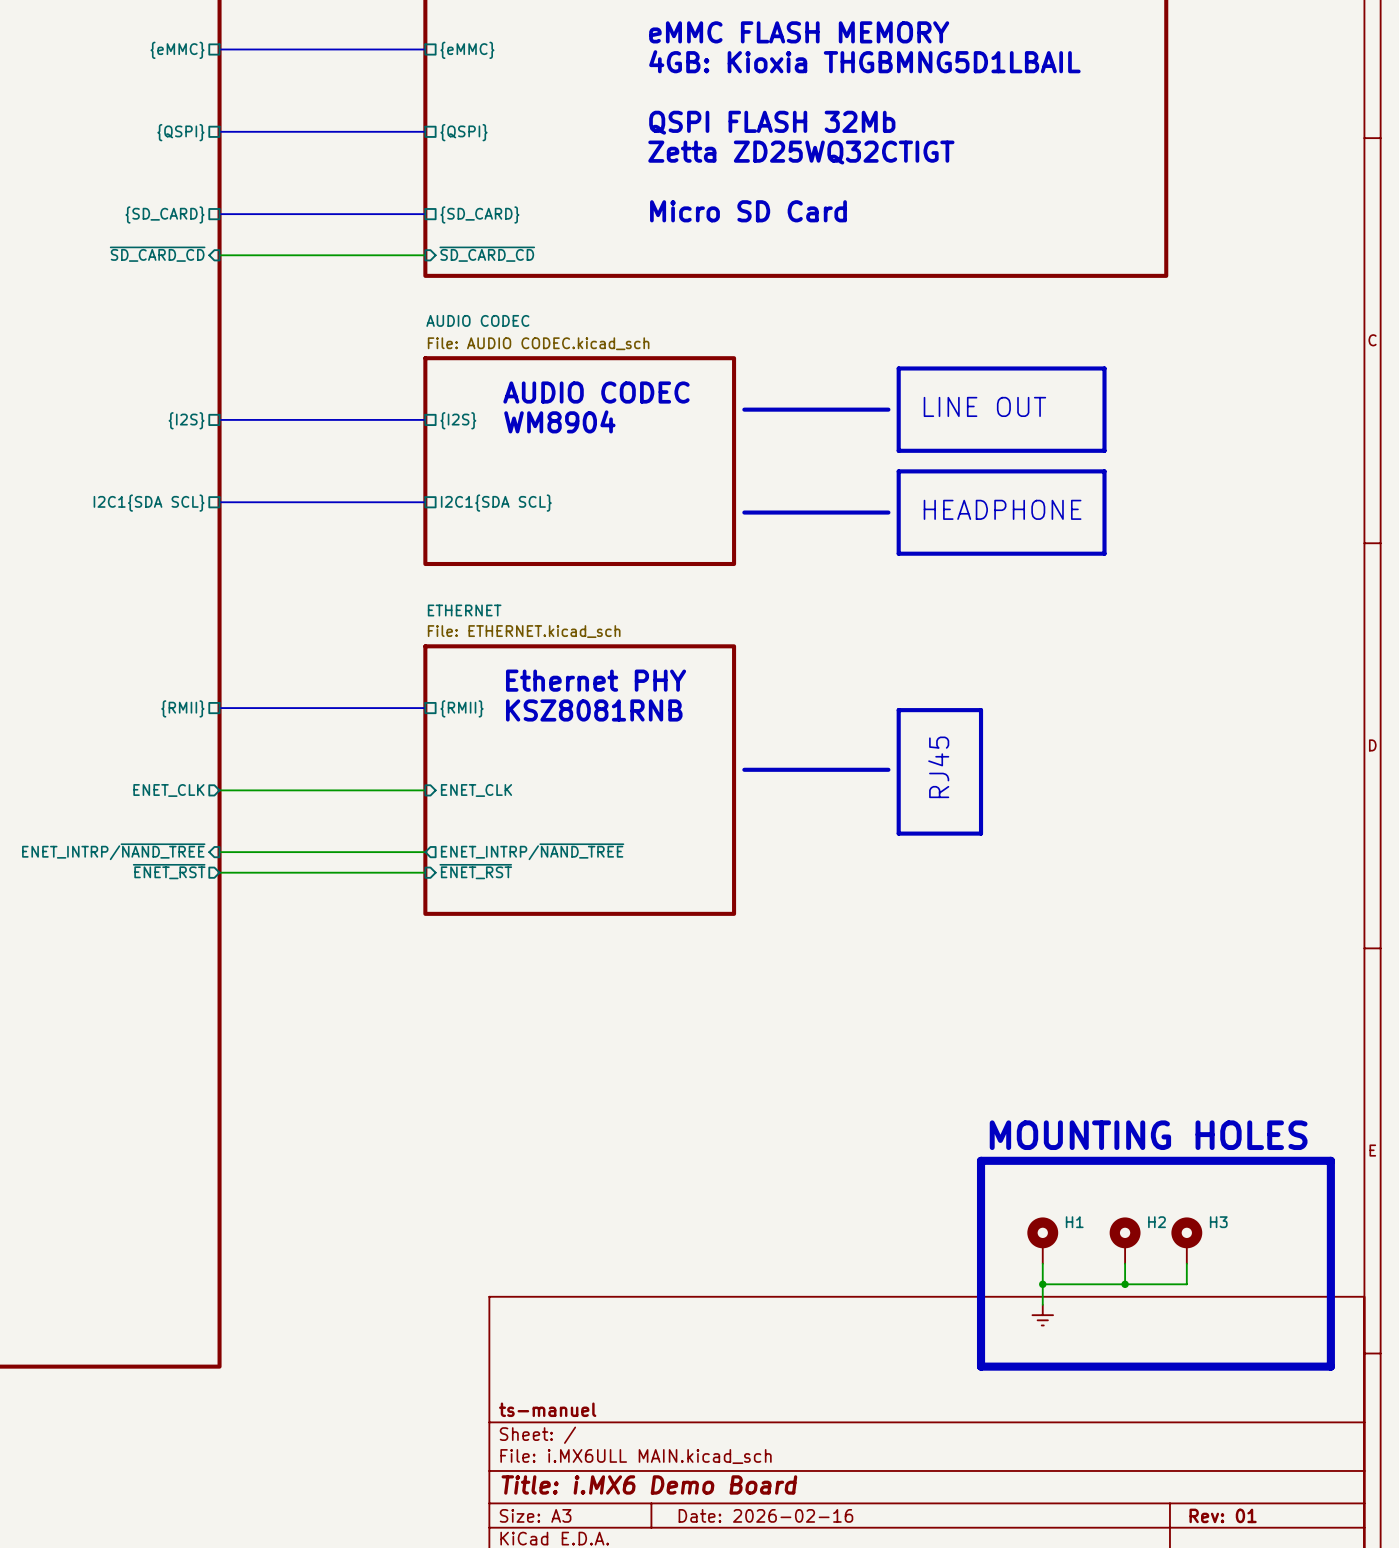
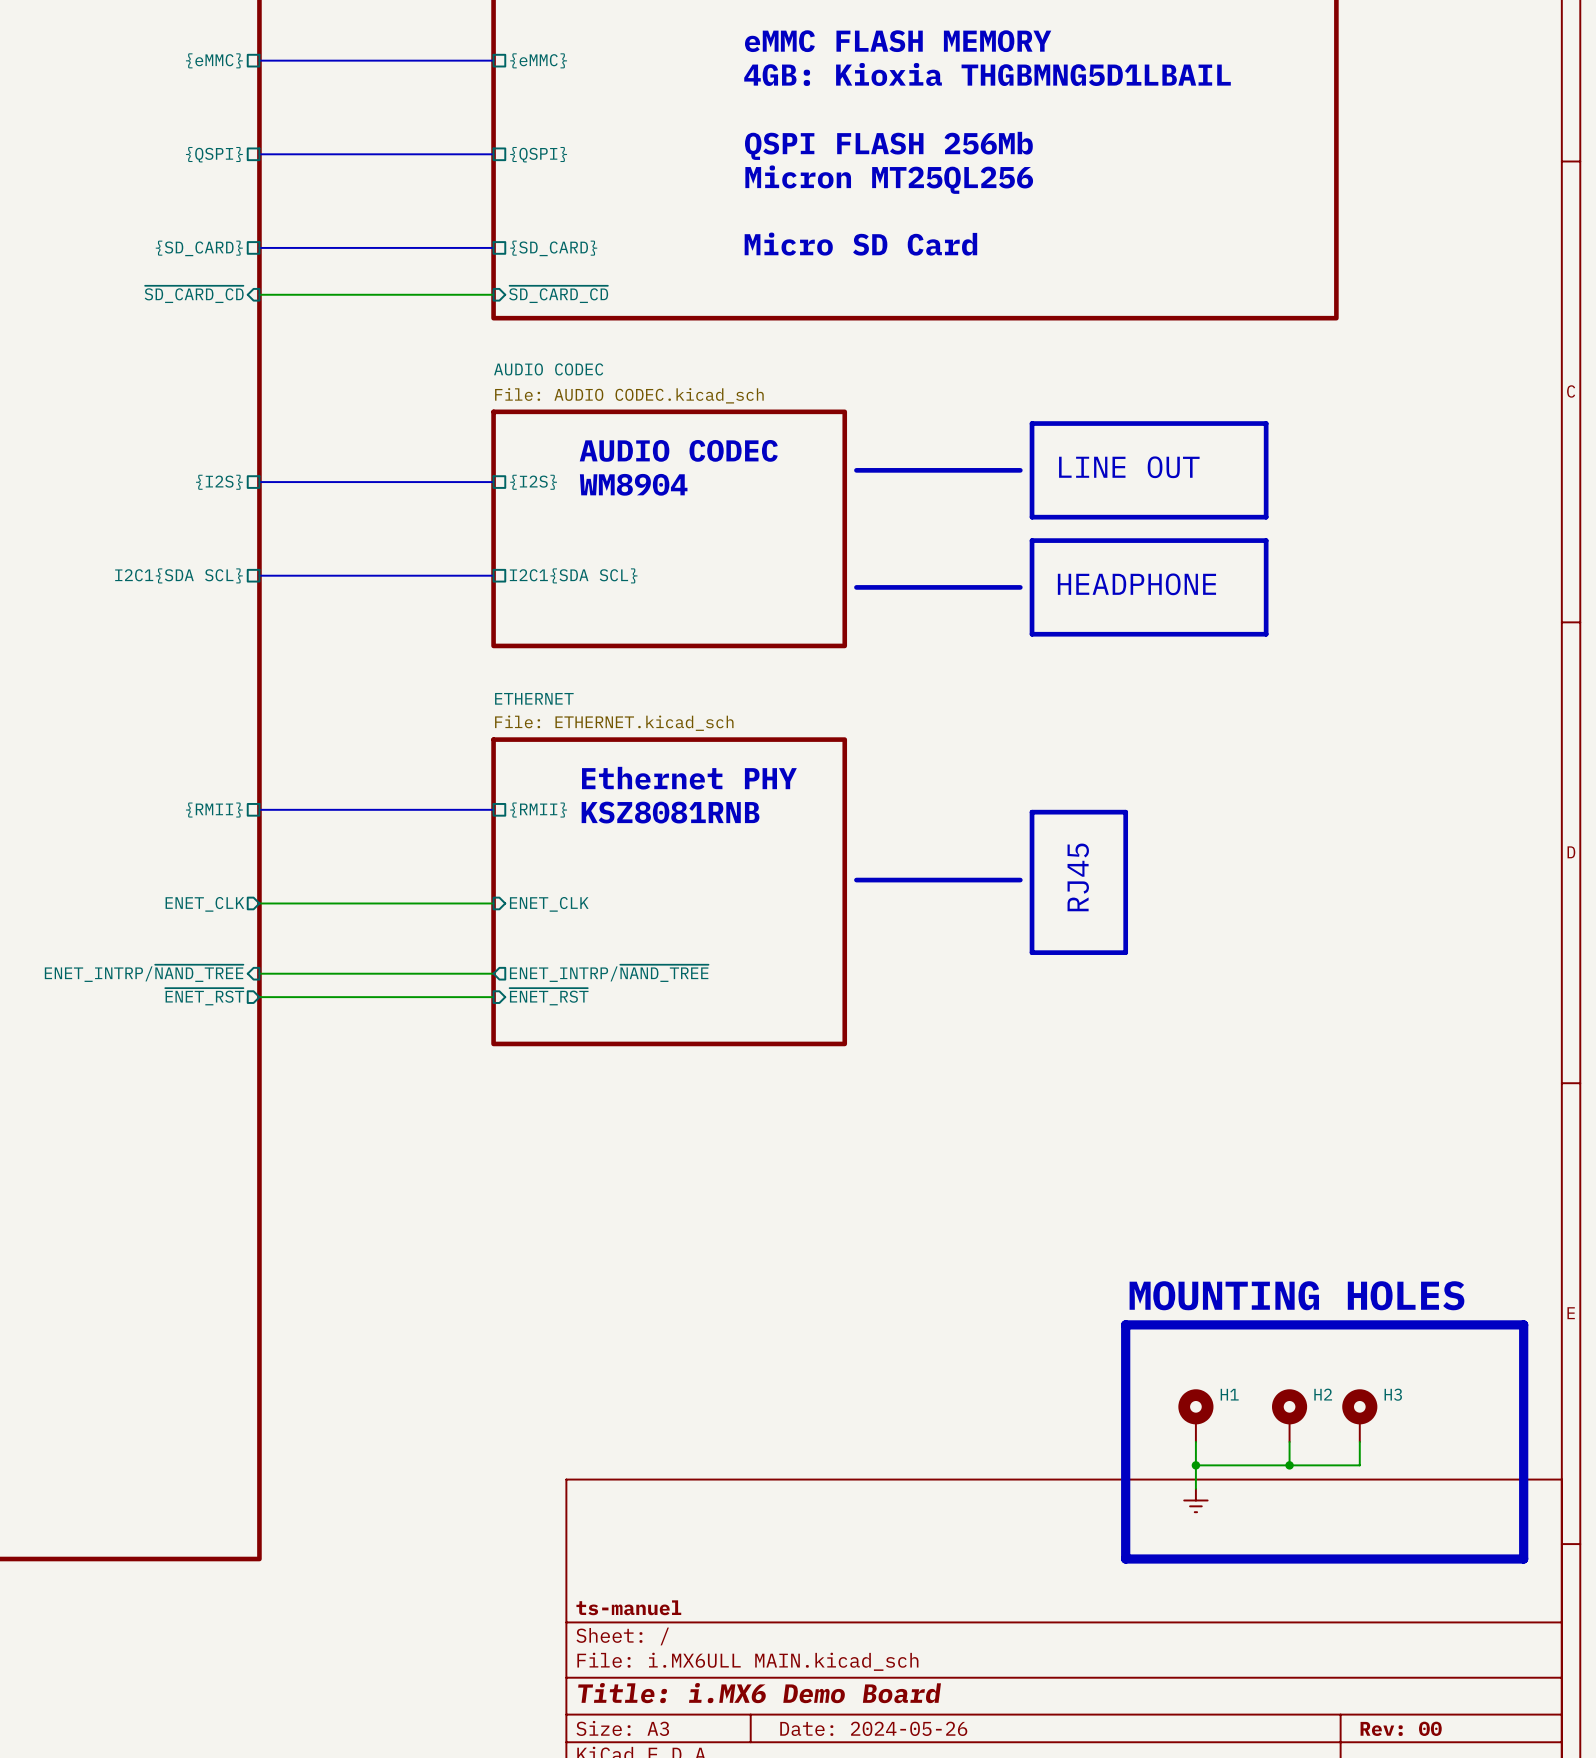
text: QSPI FLASH 32Mb (772, 122) -> QSPI FLASH 256Mb (888, 145)
text: Zetta ZD25WQ32CTIGT (801, 152) -> Micron MT25QL256 (889, 179)
title block: Date: 2026-02-16 (765, 1515) -> Date: 2024-05-26 (873, 1728)
title block: Rev: 01 (1223, 1515) -> Rev: 00 (1401, 1728)

